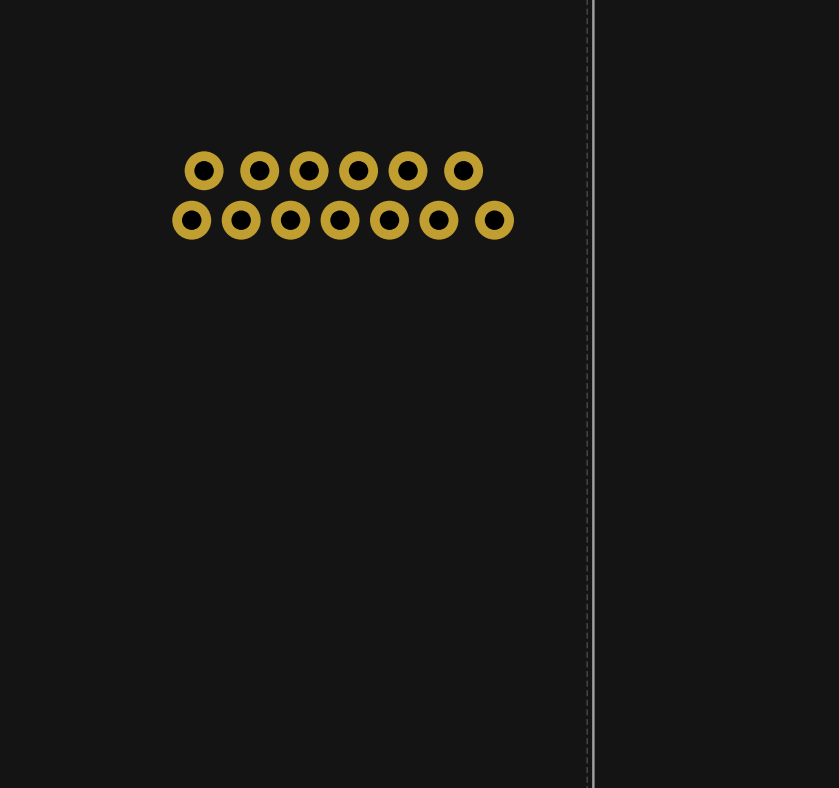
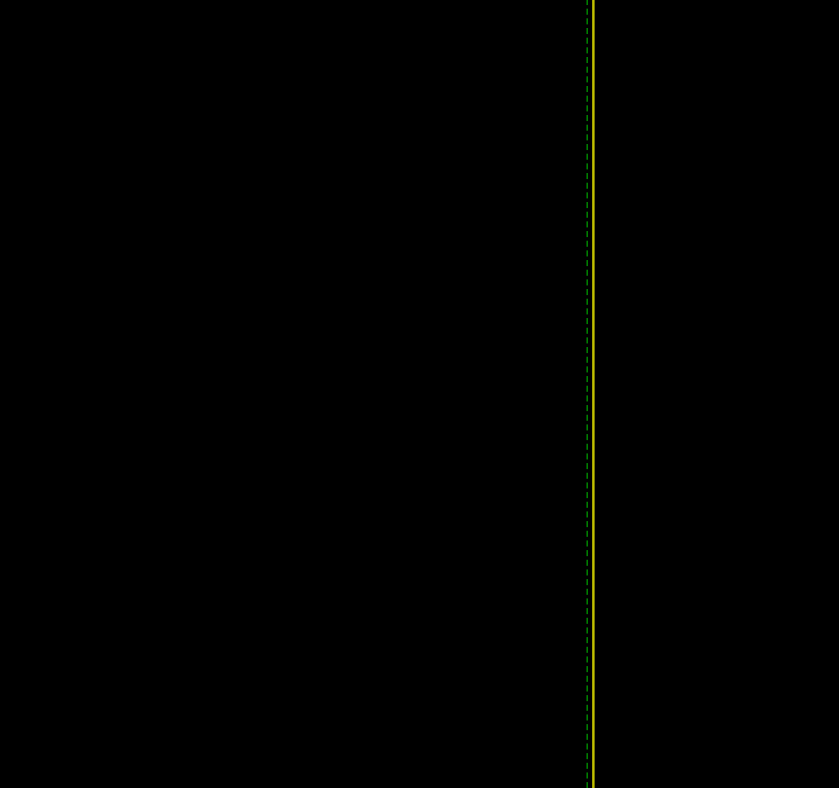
via: (204, 170) -> none
via: (259, 170) -> none
via: (309, 170) -> none
via: (358, 170) -> none
via: (408, 170) -> none
via: (463, 170) -> none
via: (191, 220) -> none
via: (241, 220) -> none
via: (290, 220) -> none
via: (340, 220) -> none
via: (389, 220) -> none
via: (438, 220) -> none
via: (494, 220) -> none

